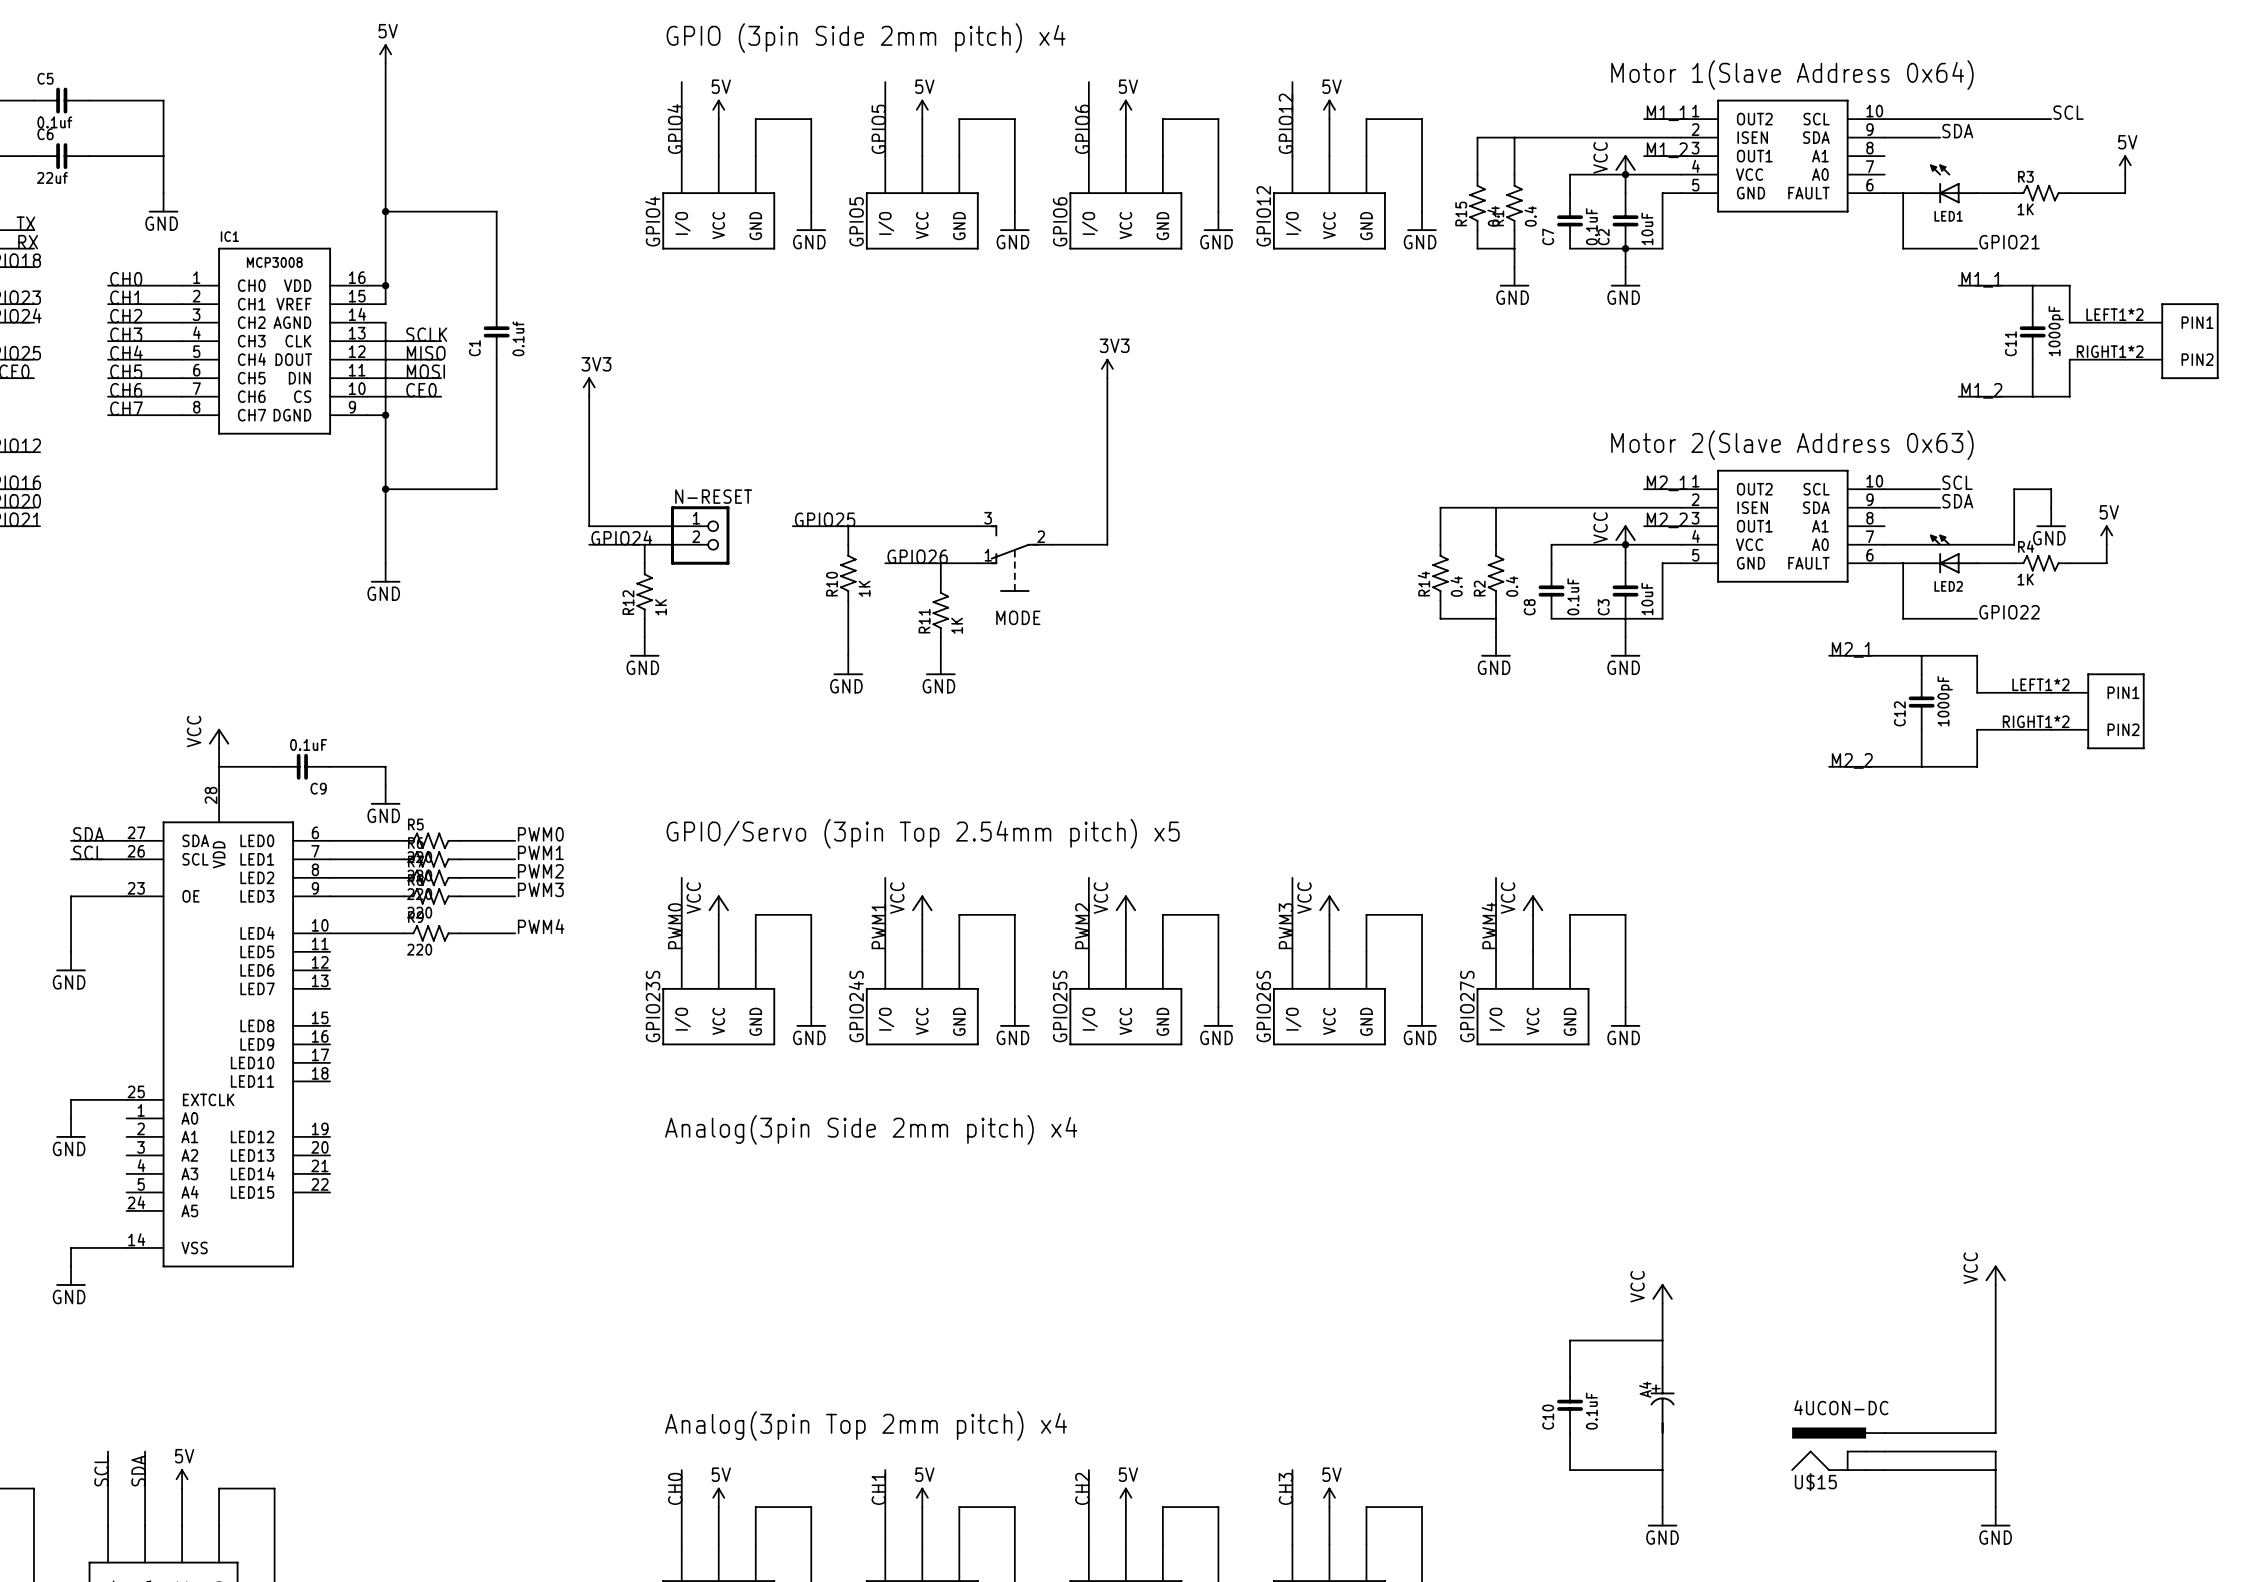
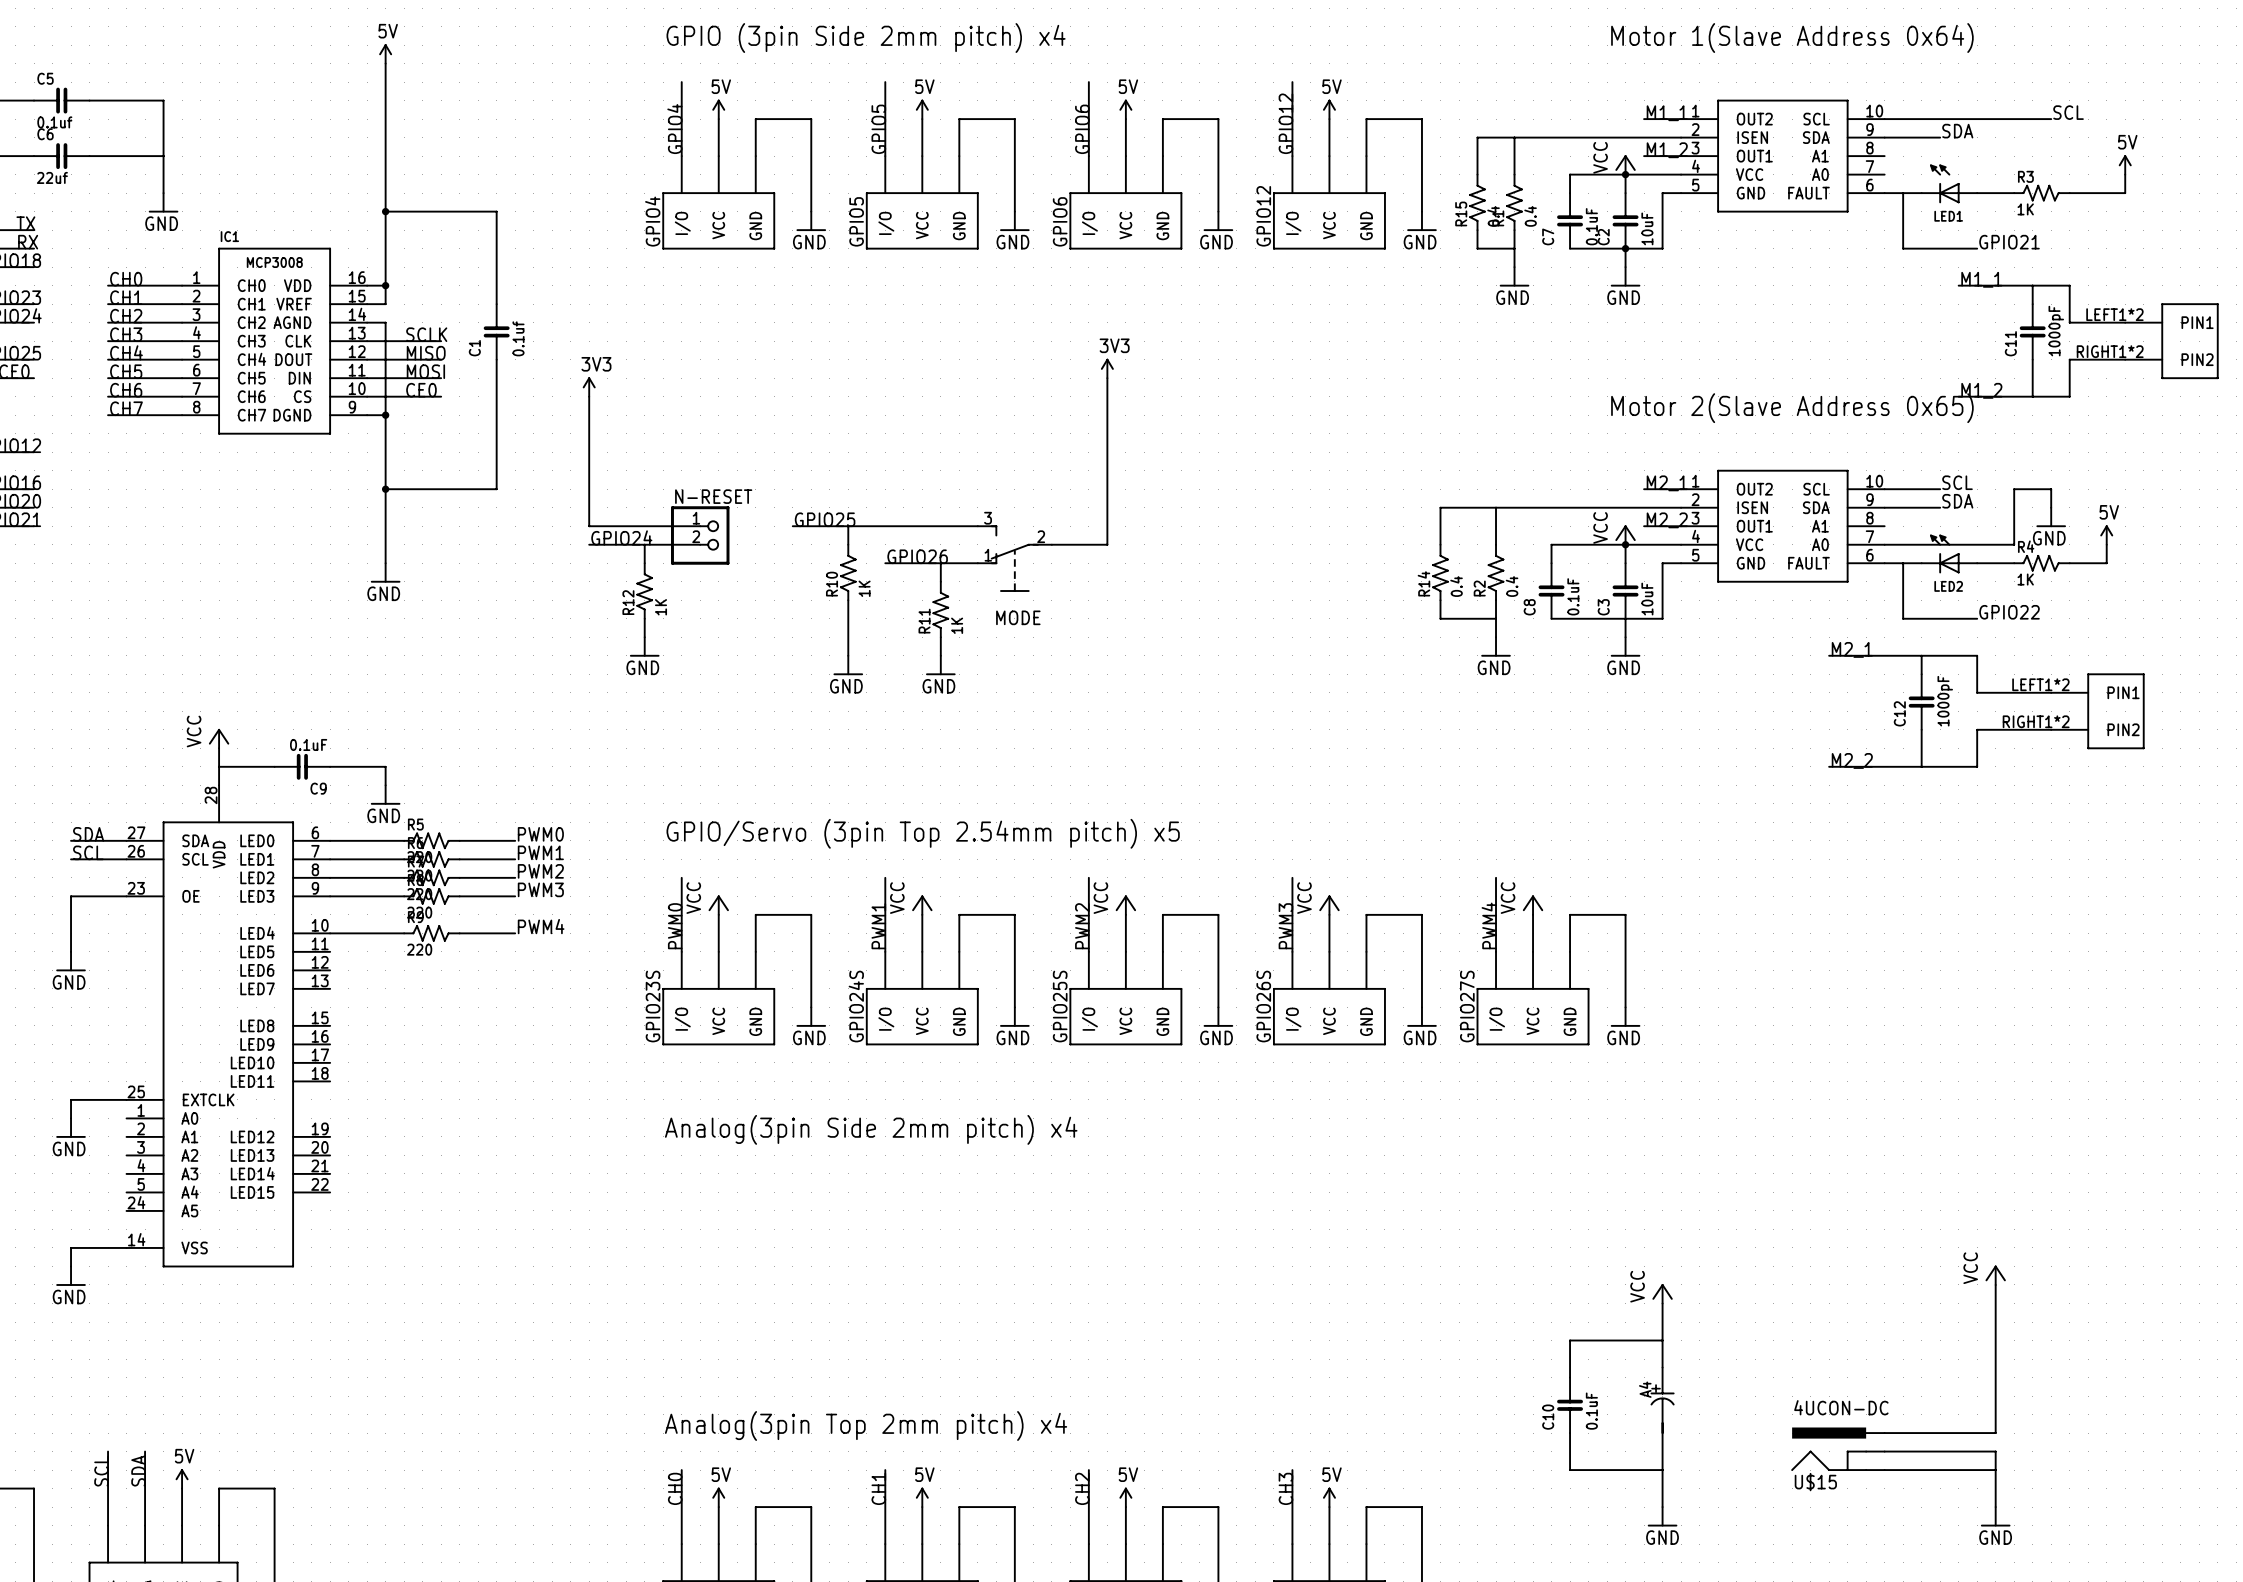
text position: Motor 1(Slave Address 0x64) (1792, 75) -> Motor 1(Slave Address 0x64) (1792, 38)
text: Motor 2(Slave Address 0x63) (1792, 445) -> Motor 2(Slave Address 0x65) (1792, 408)

